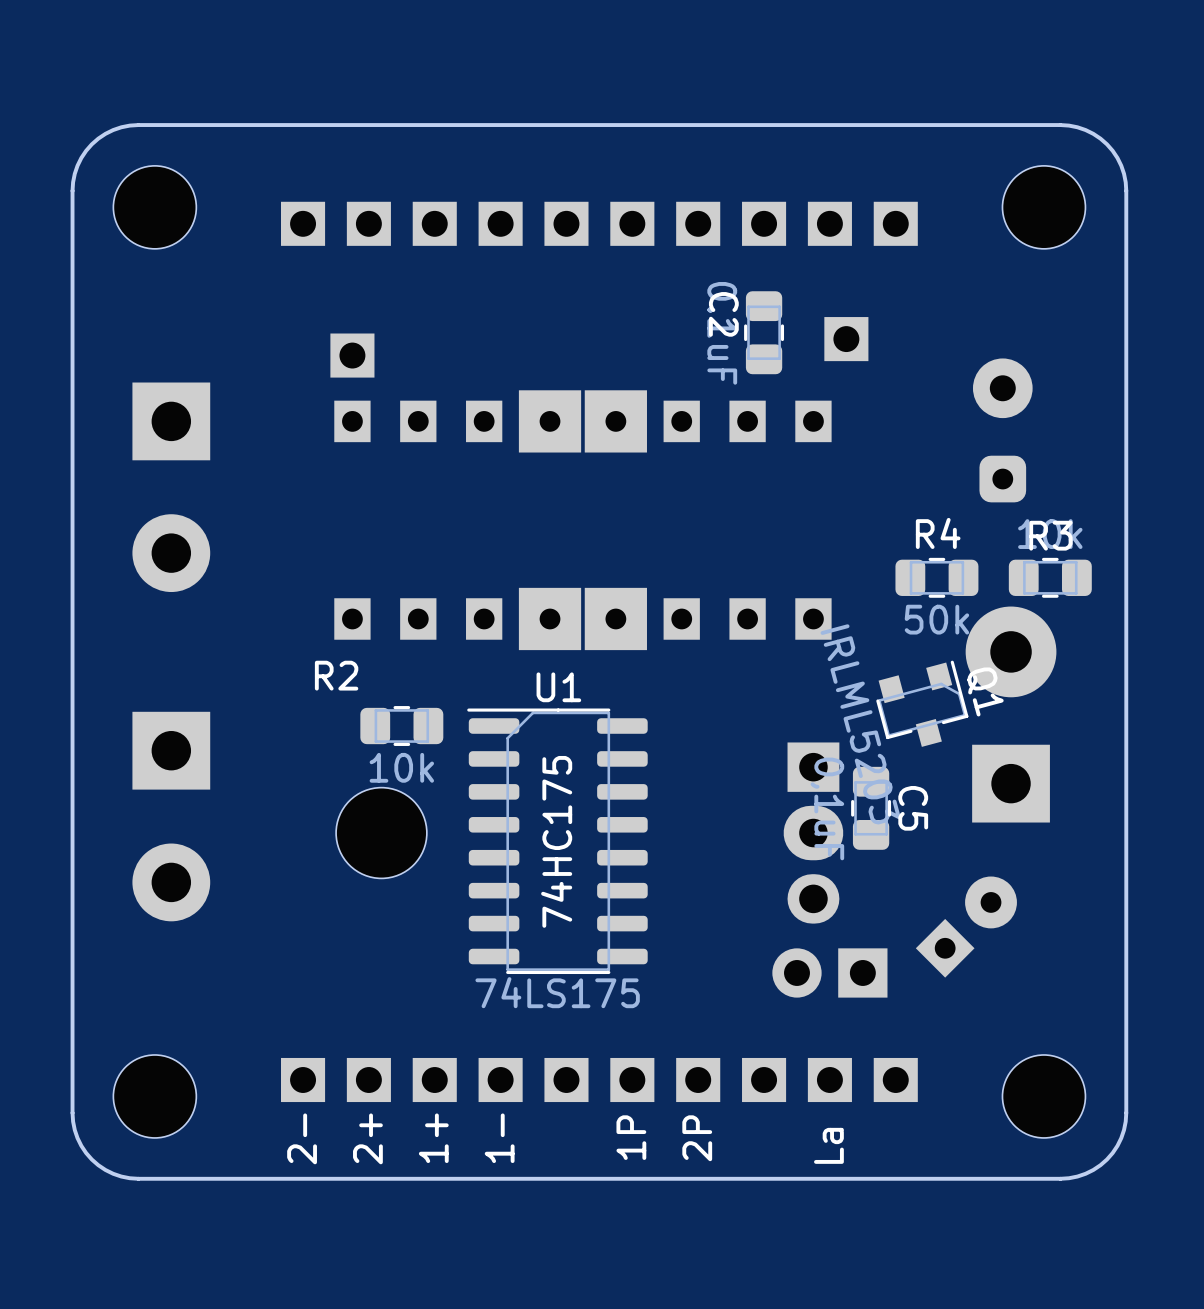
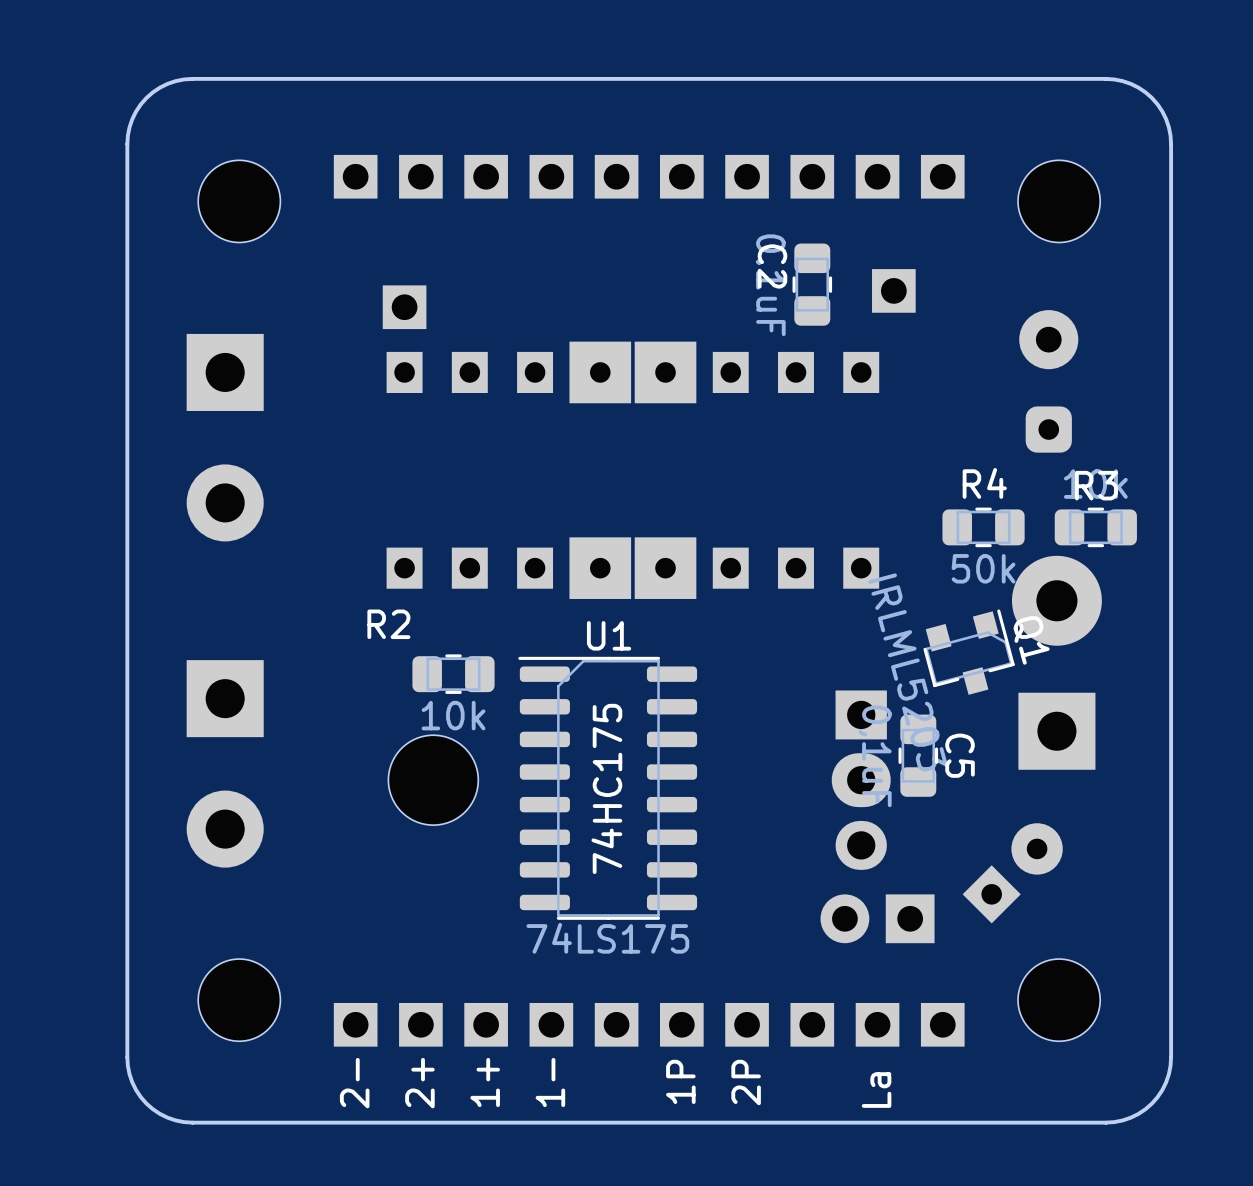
part position: (154, 207) -> (239, 201)
part position: (1043, 207) -> (1059, 201)
part position: (154, 1096) -> (239, 1000)
part position: (1043, 1096) -> (1059, 1000)

